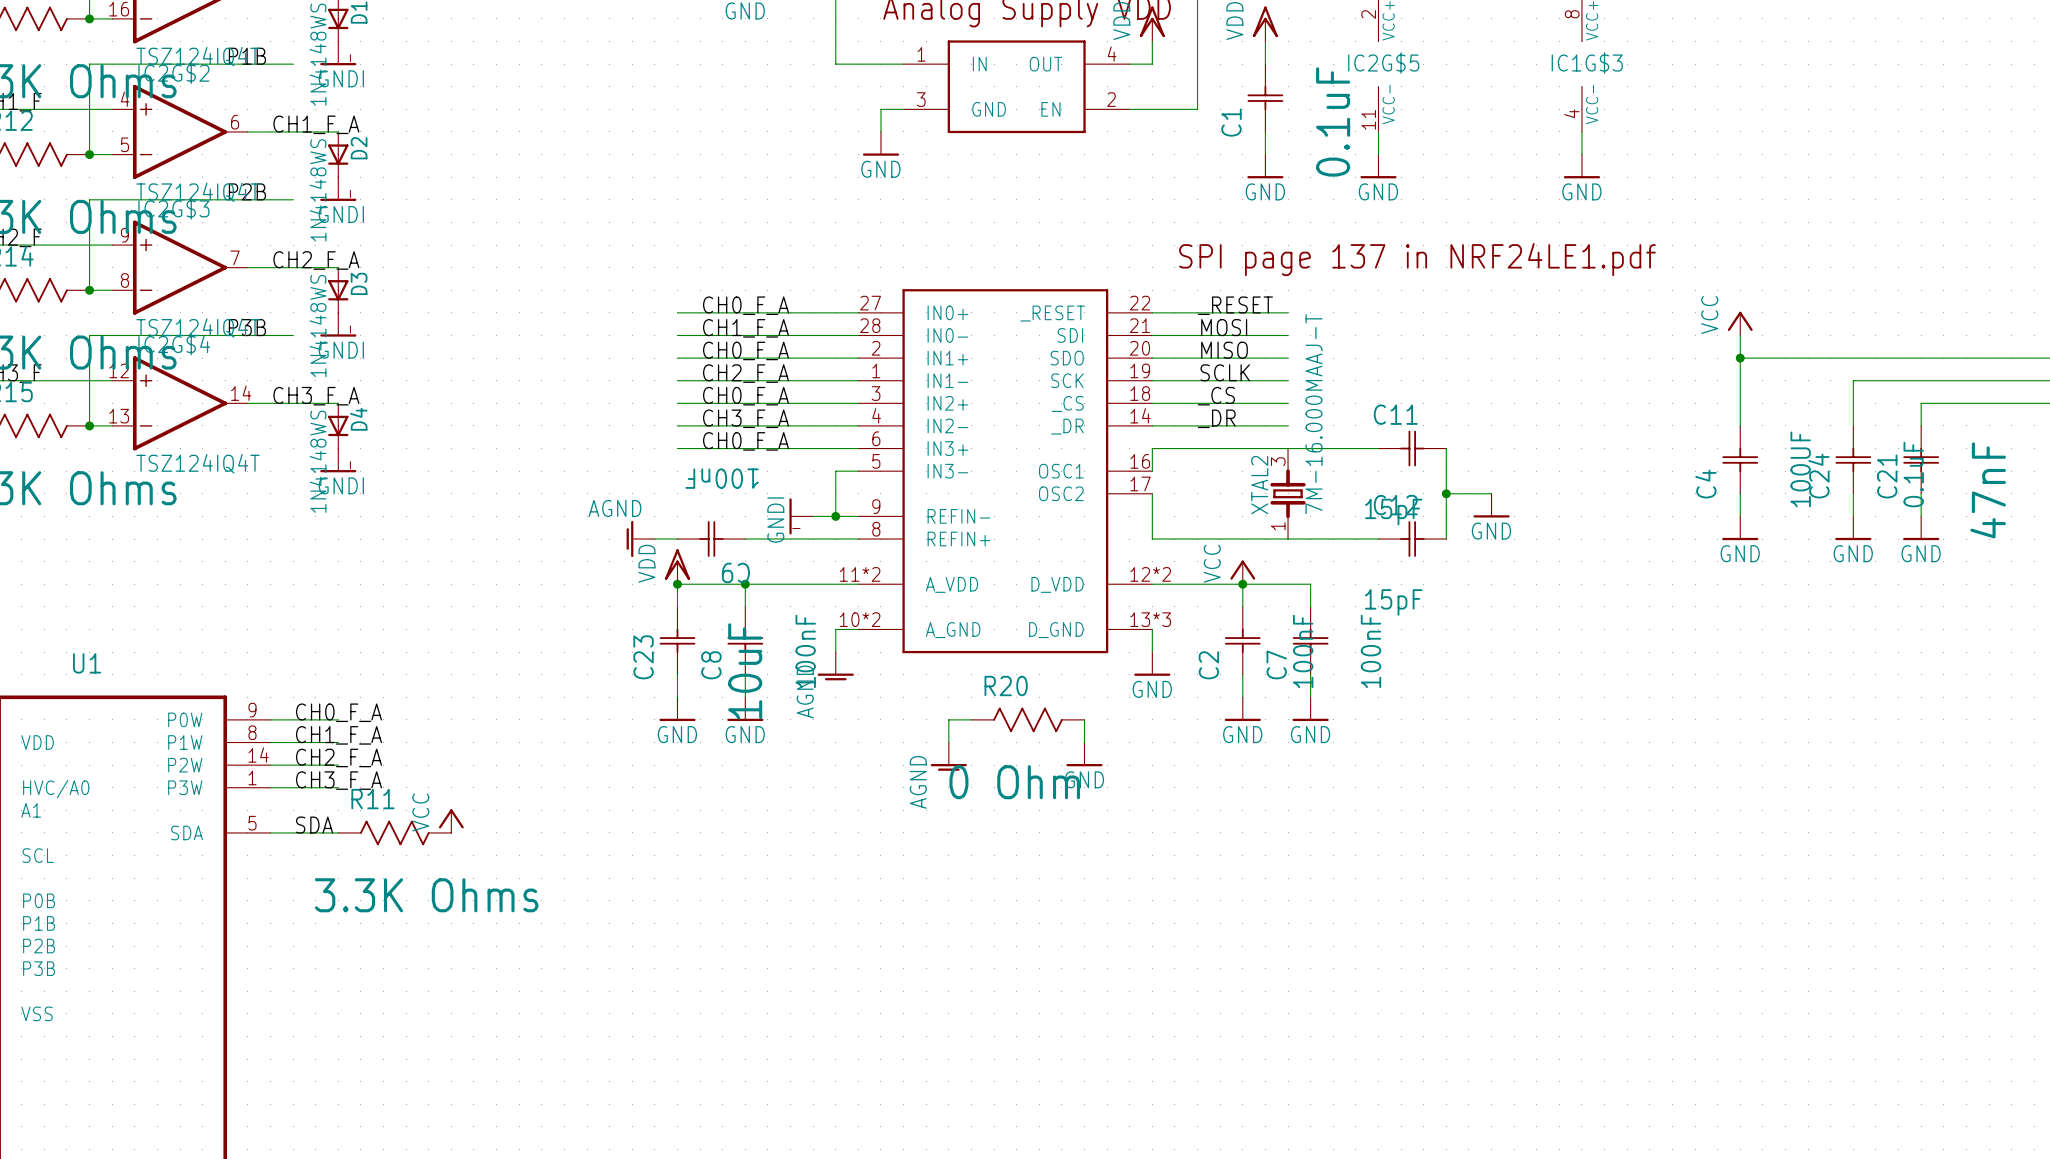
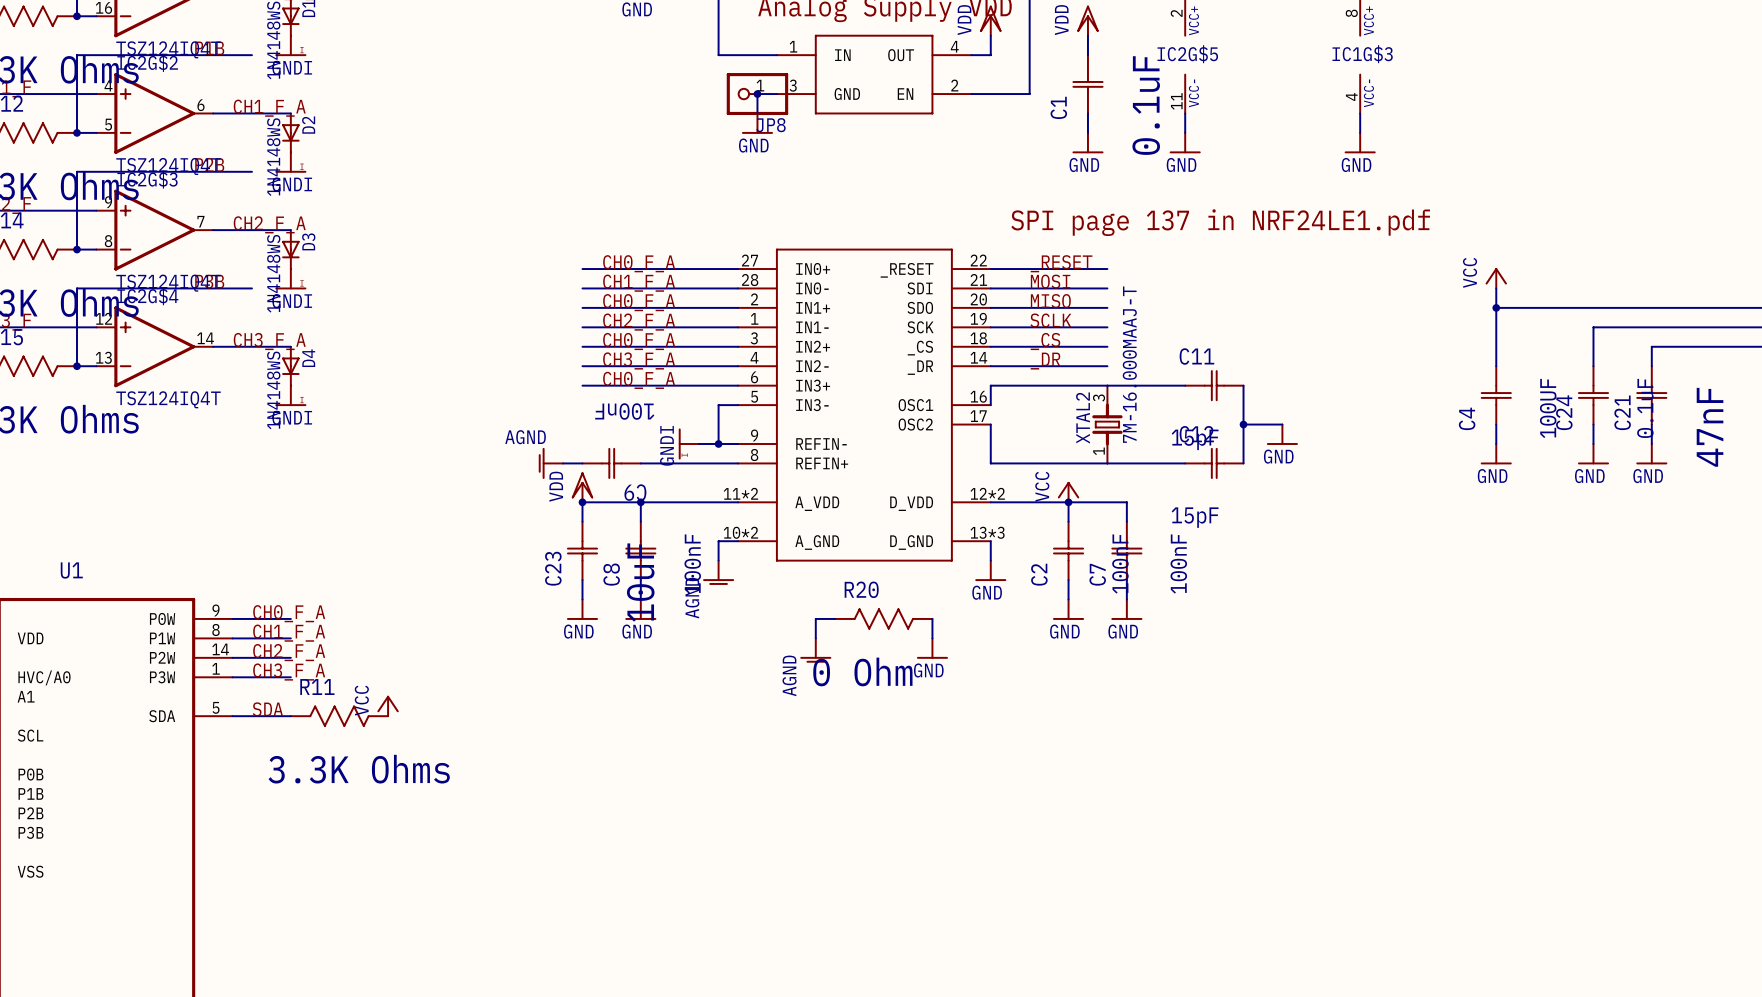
JP8: none -> (757, 94)
junction: none -> (757, 94)

